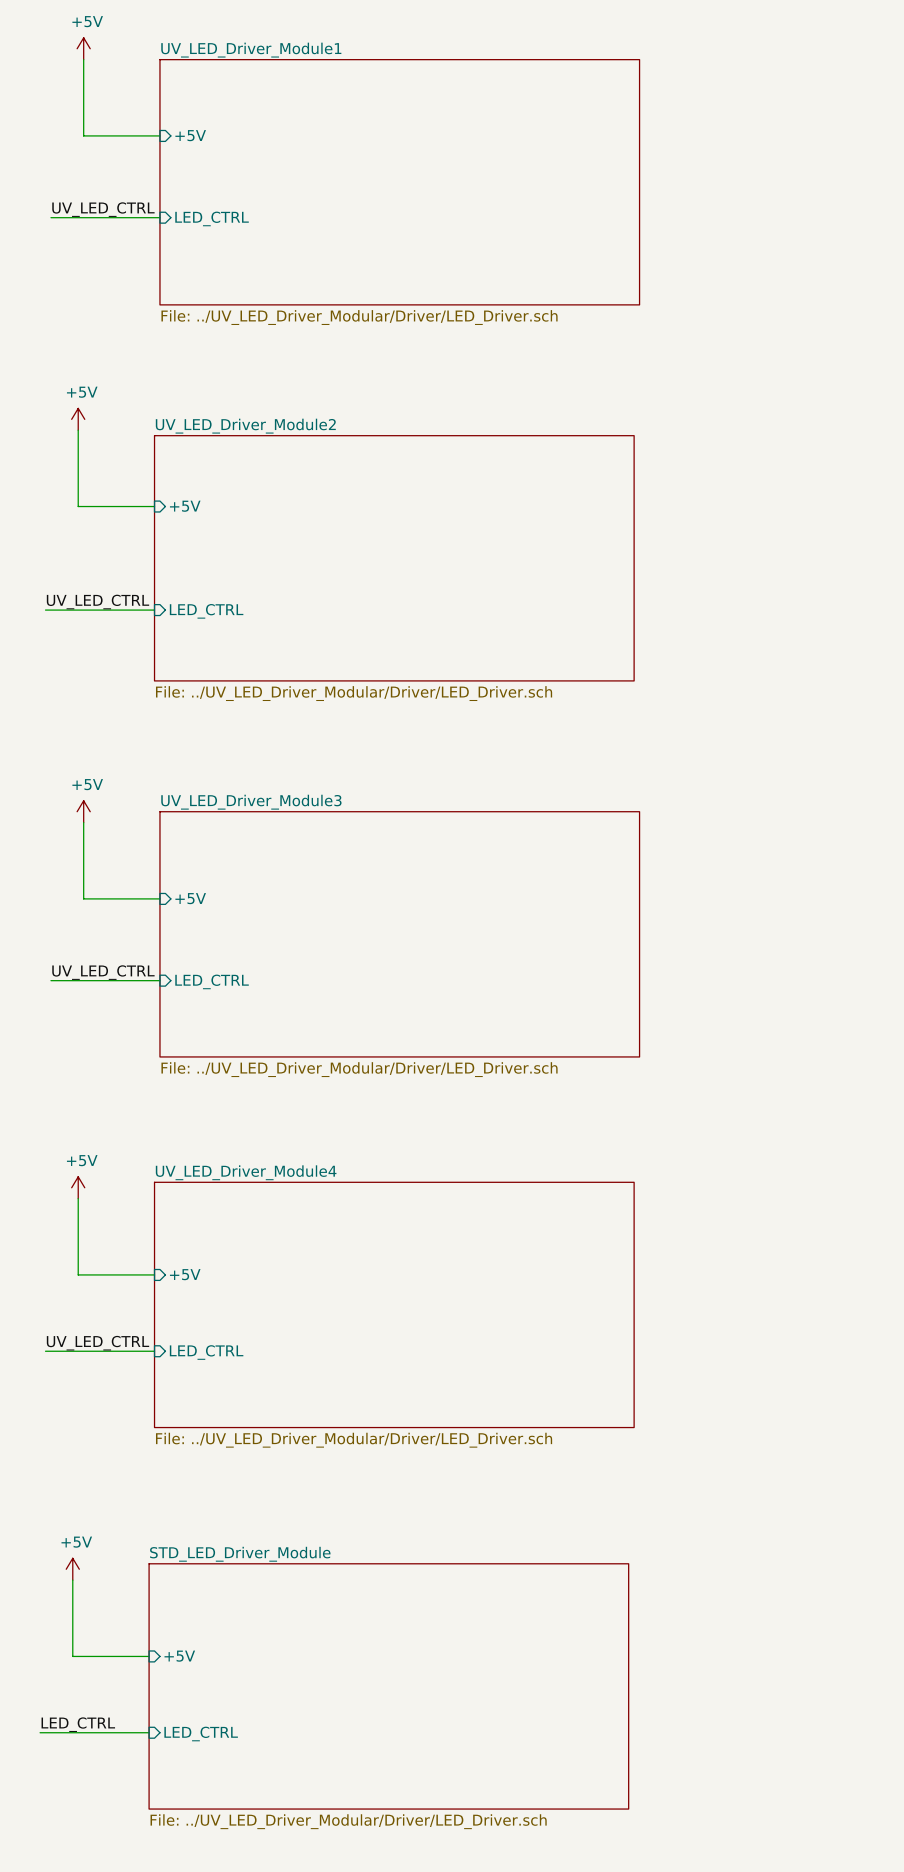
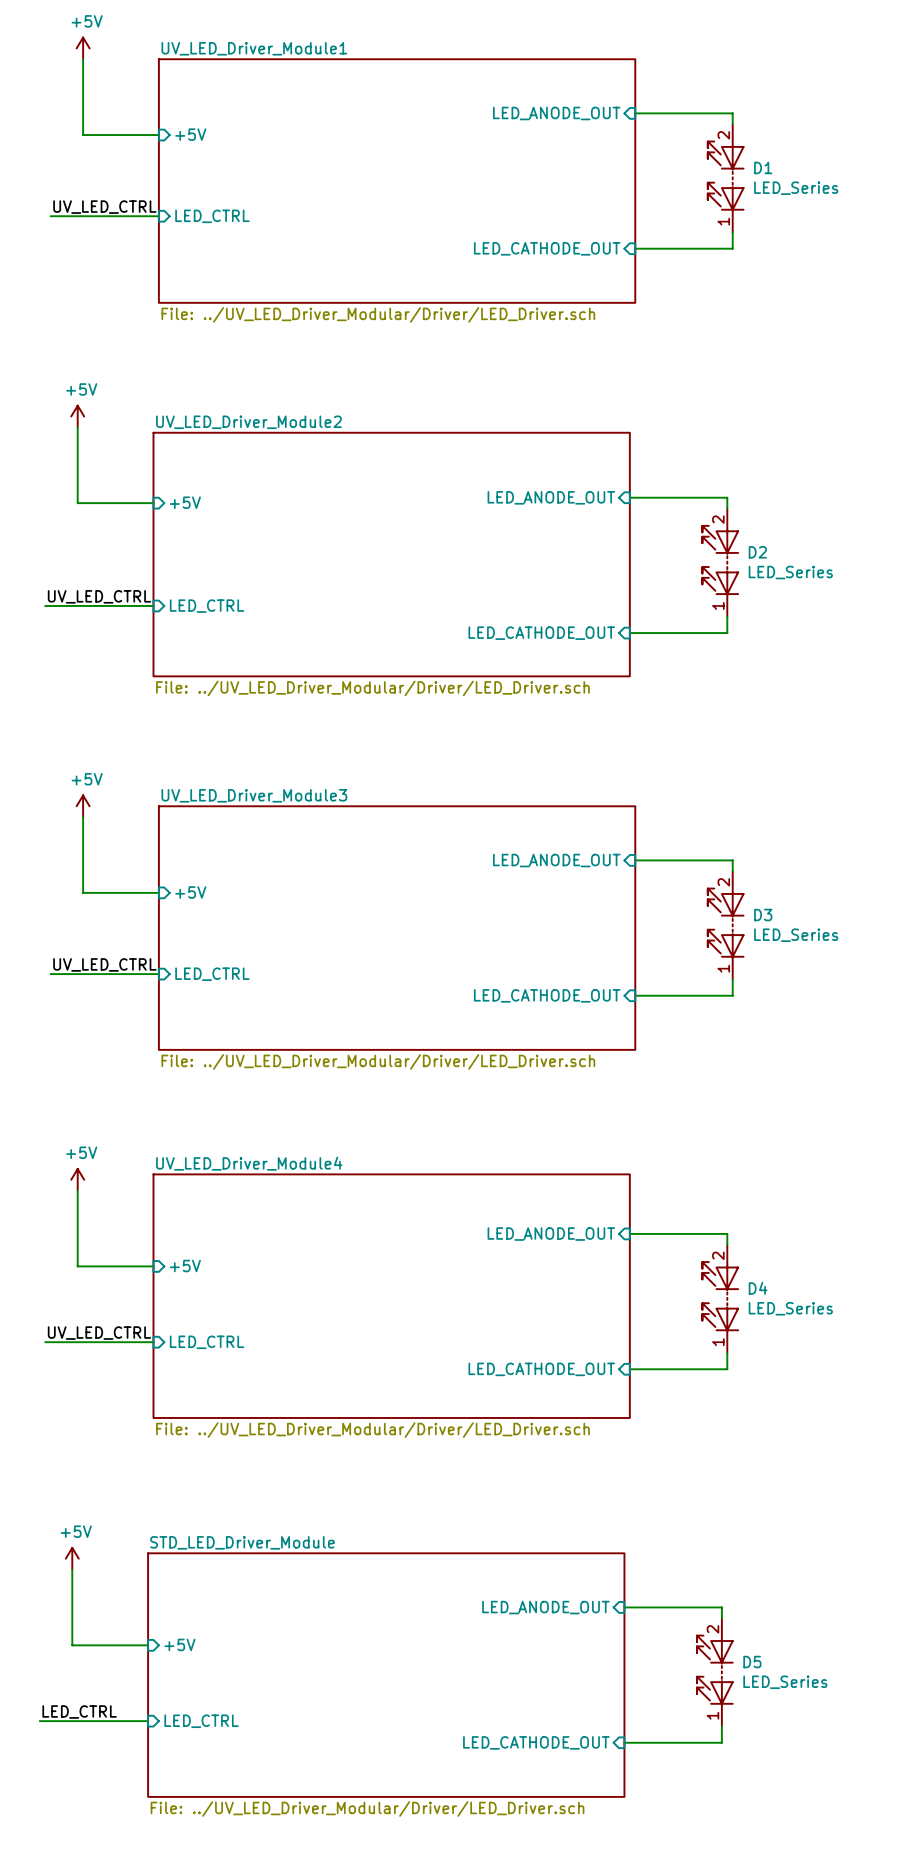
wire: none -> (635, 113) (732, 113) (732, 124)
sheet pin: none -> LED_ANODE_OUT (556, 113)
D1: none -> LED_Series (726, 178)
wire: none -> (732, 232) (732, 248) (635, 248)
sheet pin: none -> LED_CATHODE_OUT (547, 248)
wire: none -> (629, 497) (727, 497) (727, 508)
sheet pin: none -> LED_ANODE_OUT (551, 497)
D2: none -> LED_Series (720, 562)
wire: none -> (727, 616) (727, 633) (629, 633)
sheet pin: none -> LED_CATHODE_OUT (541, 633)
wire: none -> (635, 860) (732, 860) (732, 871)
sheet pin: none -> LED_ANODE_OUT (556, 860)
D3: none -> LED_Series (726, 925)
wire: none -> (732, 979) (732, 995) (635, 995)
sheet pin: none -> LED_CATHODE_OUT (547, 995)
wire: none -> (629, 1233) (727, 1233) (727, 1244)
sheet pin: none -> LED_ANODE_OUT (551, 1234)
D4: none -> LED_Series (720, 1298)
wire: none -> (727, 1353) (727, 1369) (629, 1369)
sheet pin: none -> LED_CATHODE_OUT (541, 1369)
wire: none -> (624, 1607) (721, 1607) (721, 1618)
sheet pin: none -> LED_ANODE_OUT (545, 1607)
D5: none -> LED_Series (715, 1672)
wire: none -> (721, 1726) (721, 1742) (624, 1742)
sheet pin: none -> LED_CATHODE_OUT (536, 1742)

